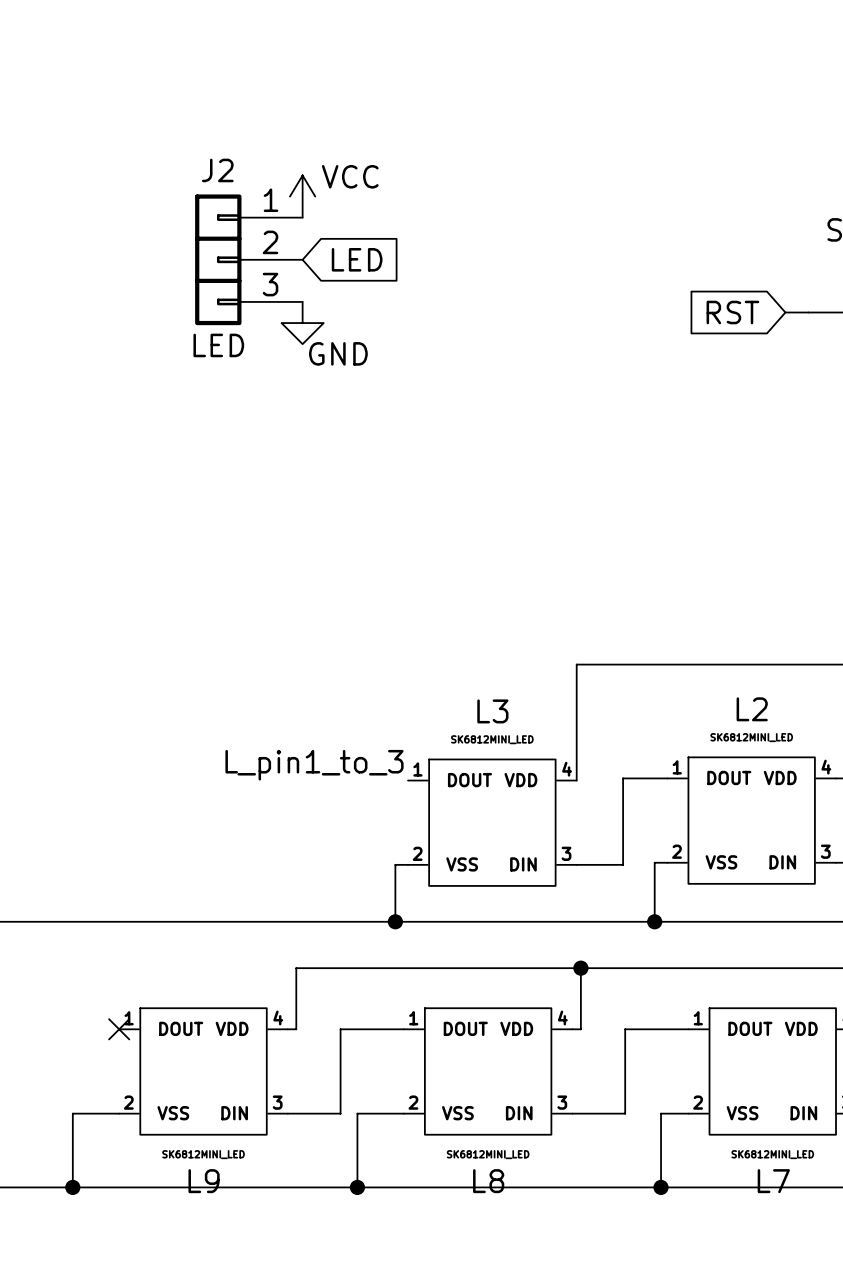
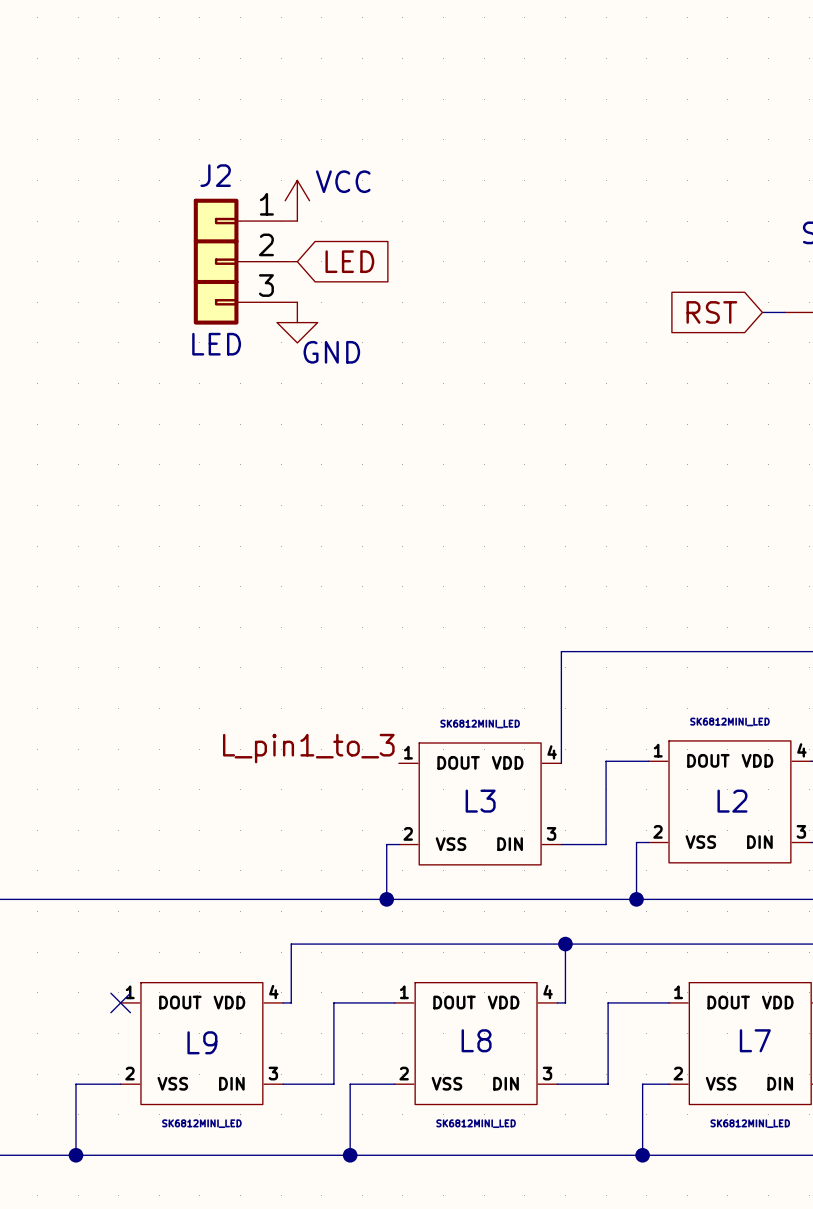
L2 name position: L2 (752, 709) -> L2 (732, 801)
L3 name position: L3 (492, 711) -> L3 (480, 801)
L9 name position: L9 (204, 1181) -> L9 (202, 1042)
L8 name position: L8 (488, 1181) -> L8 (476, 1040)
L7 name position: L7 (773, 1181) -> L7 (755, 1040)

